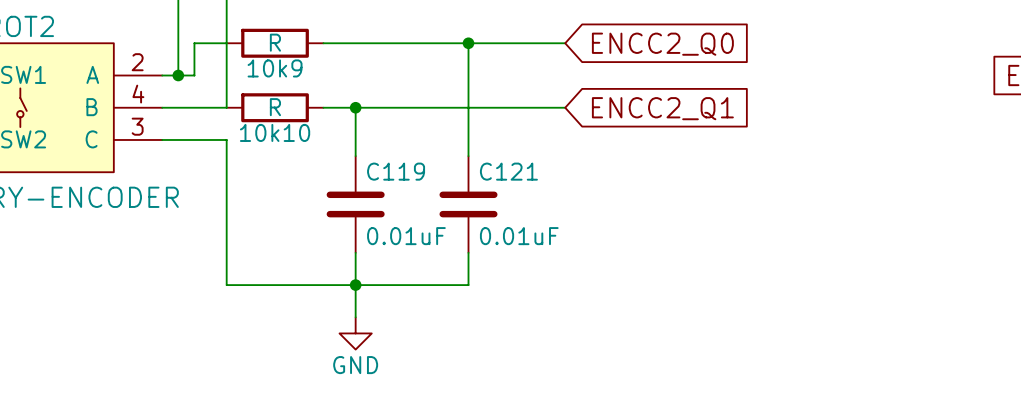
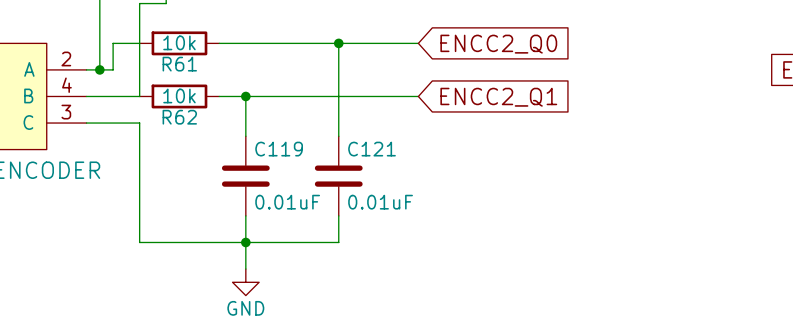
10k9 value: R (275, 42) -> 10k (179, 42)
10k9 name: 10k9 (275, 68) -> R61 (179, 64)
10k10 value: R (275, 107) -> 10k (179, 95)
10k10 name: 10k10 (275, 132) -> R62 (179, 117)

